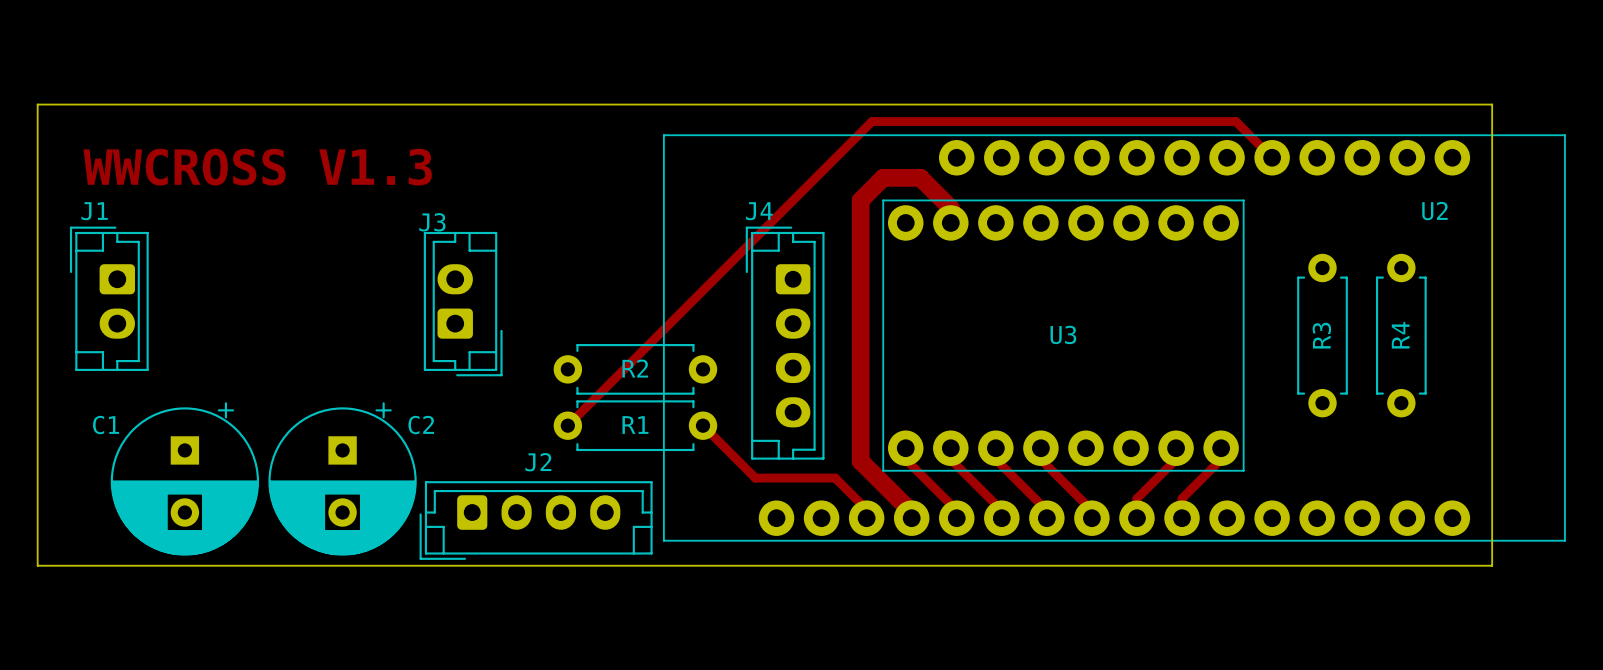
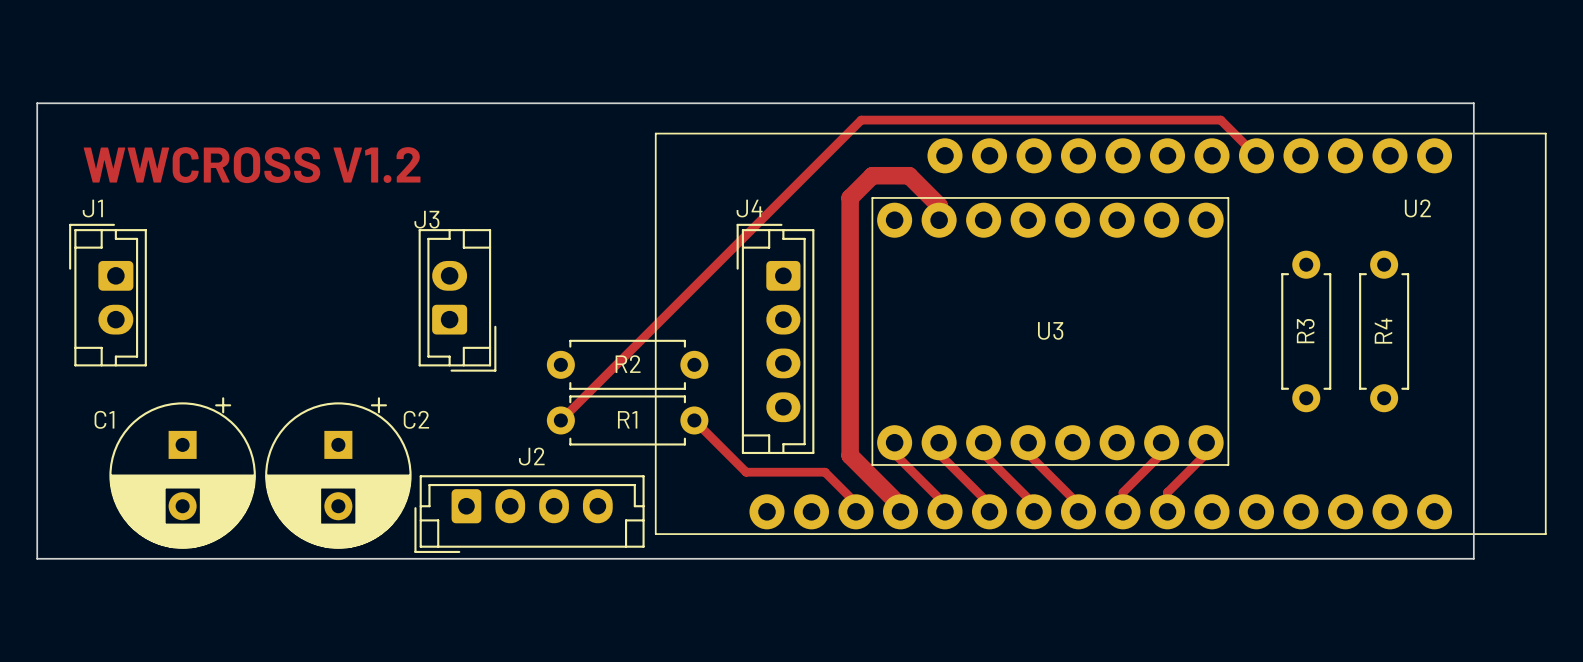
text: WWCROSS V1.3 (257, 167) -> WWCROSS V1.2 (252, 165)

